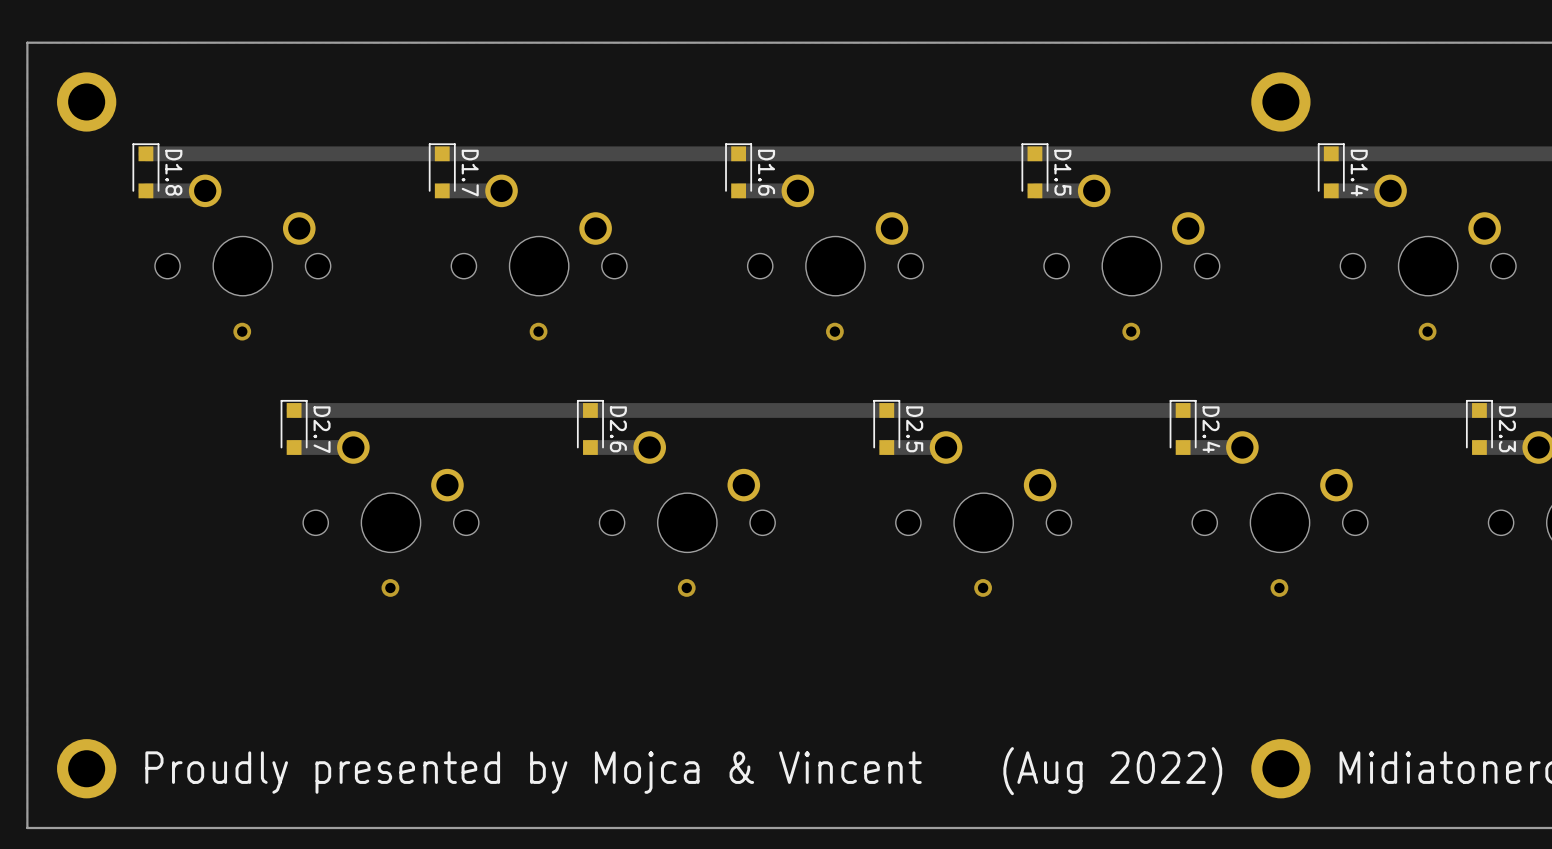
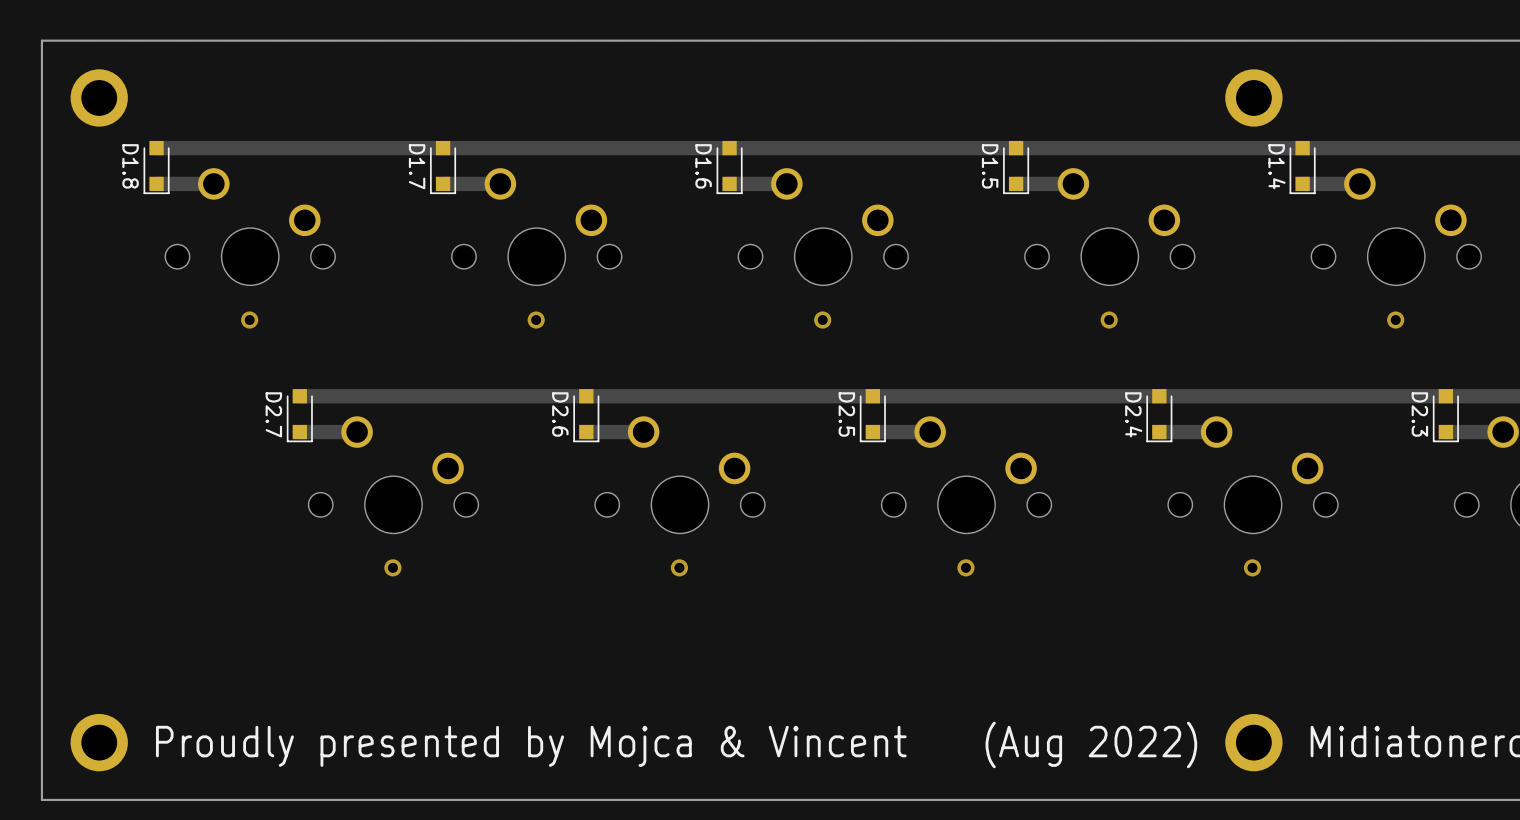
D1.8 rotation: 0° (145, 170) -> 180° (156, 167)
D1.7 rotation: 0° (442, 170) -> 180° (443, 167)
D1.6 rotation: 0° (738, 170) -> 180° (729, 167)
D1.5 rotation: 0° (1034, 170) -> 180° (1016, 167)
D1.4 rotation: 0° (1331, 170) -> 180° (1302, 167)
D2.7 rotation: 0° (294, 427) -> 180° (299, 415)
D2.6 rotation: 0° (590, 427) -> 180° (586, 415)
D2.5 rotation: 0° (886, 427) -> 180° (872, 415)
D2.4 rotation: 0° (1183, 427) -> 180° (1159, 415)
D2.3 rotation: 0° (1479, 427) -> 180° (1445, 415)

